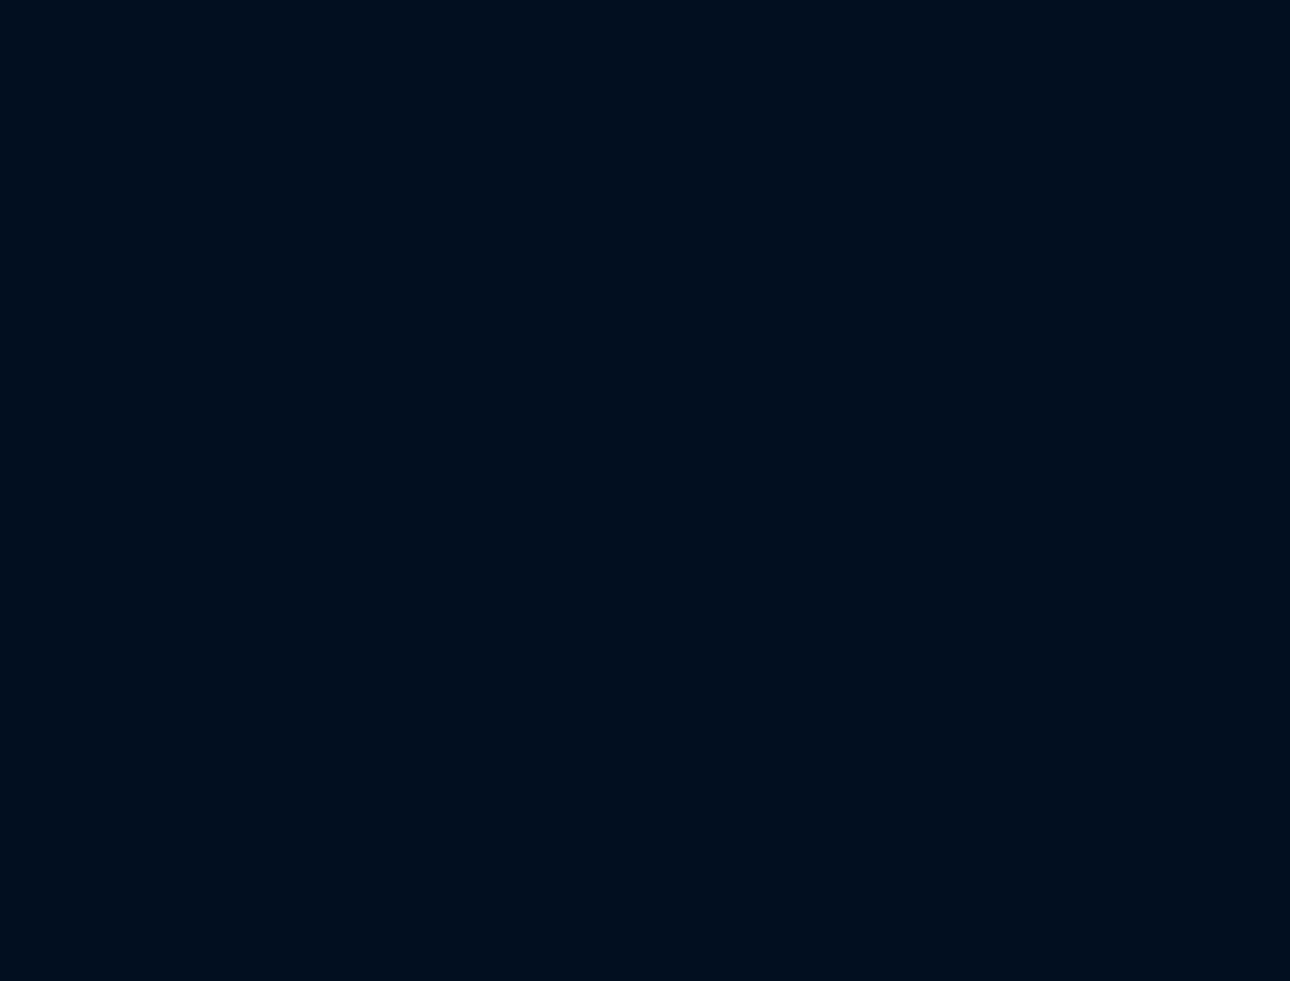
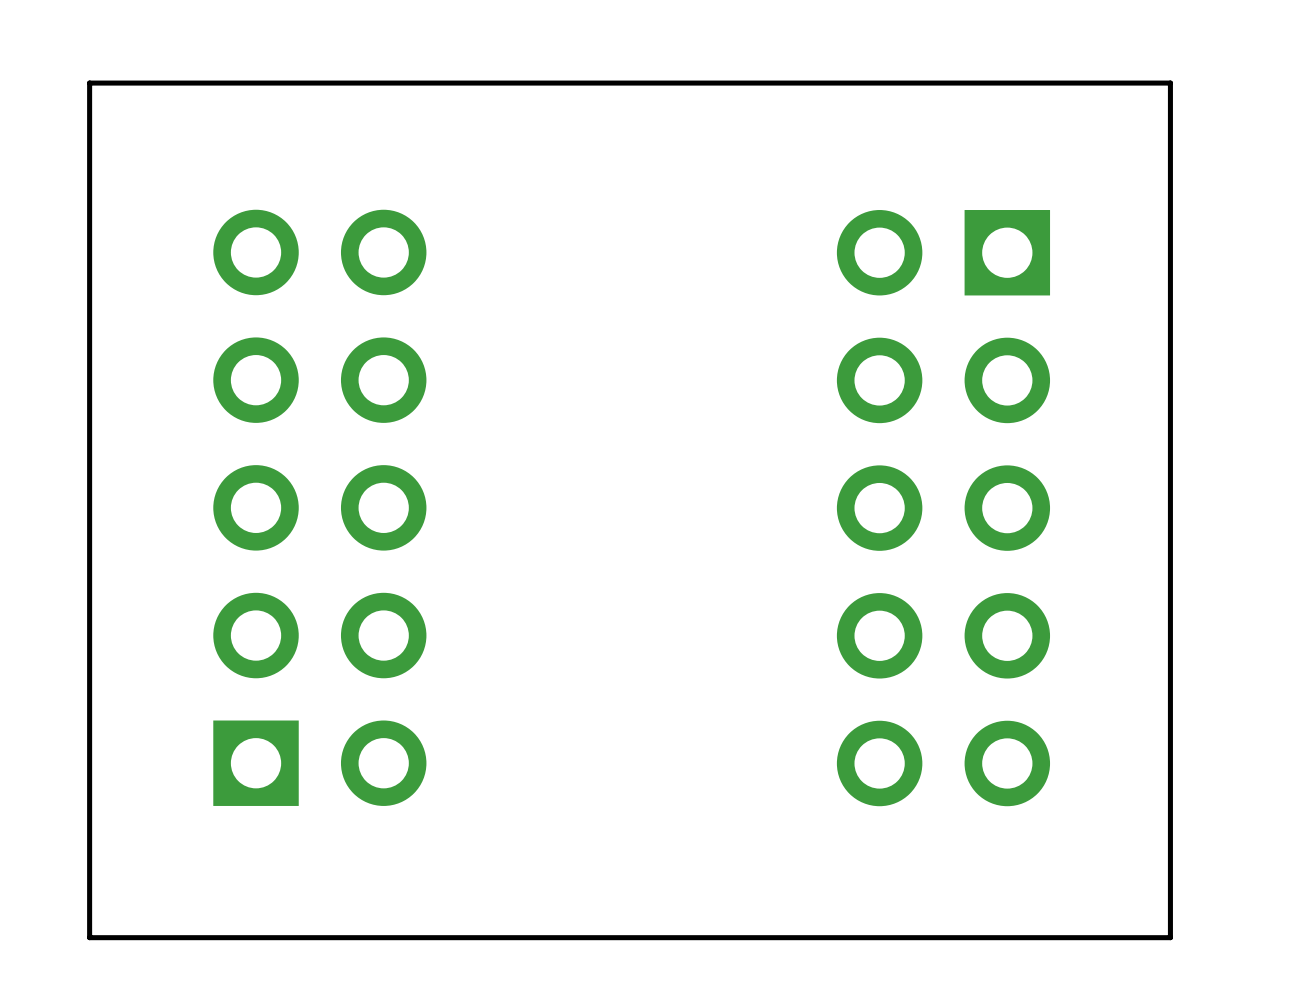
board edge: none -> (1170, 83) (89, 83) (89, 937) (1170, 937) (1170, 83)
part: none -> (319, 507)
part: none -> (943, 508)

